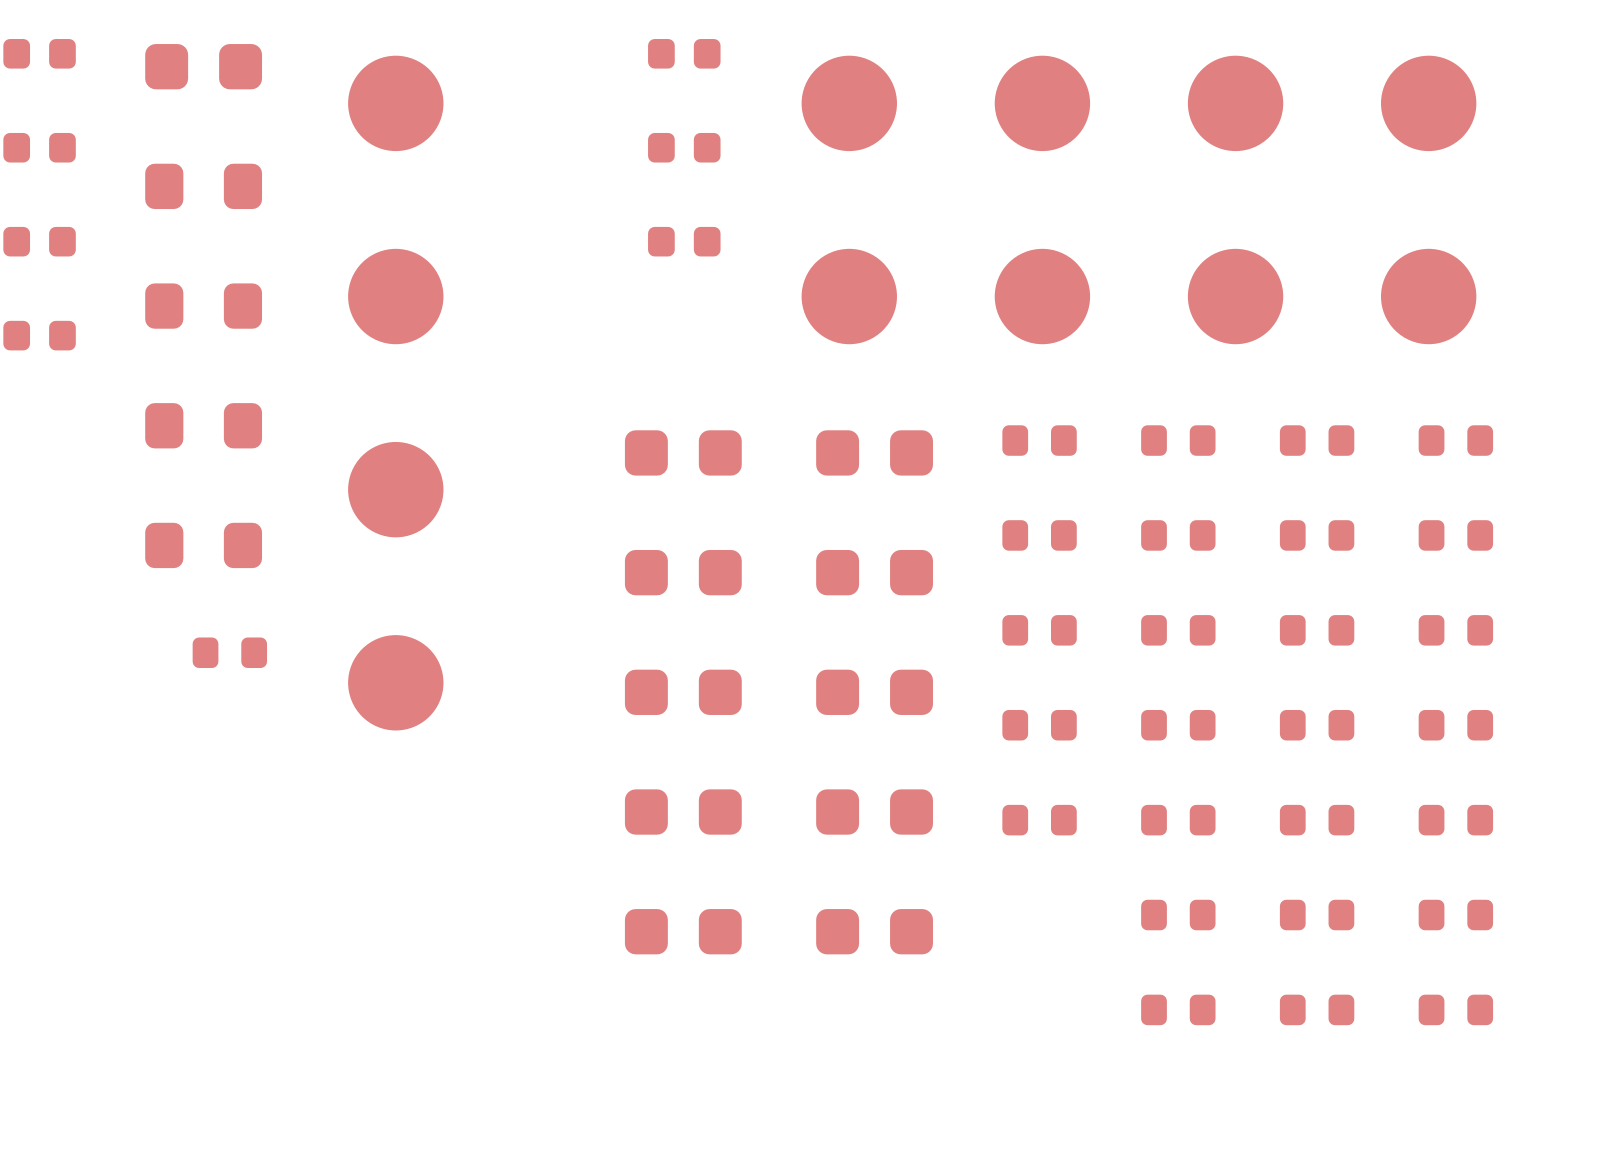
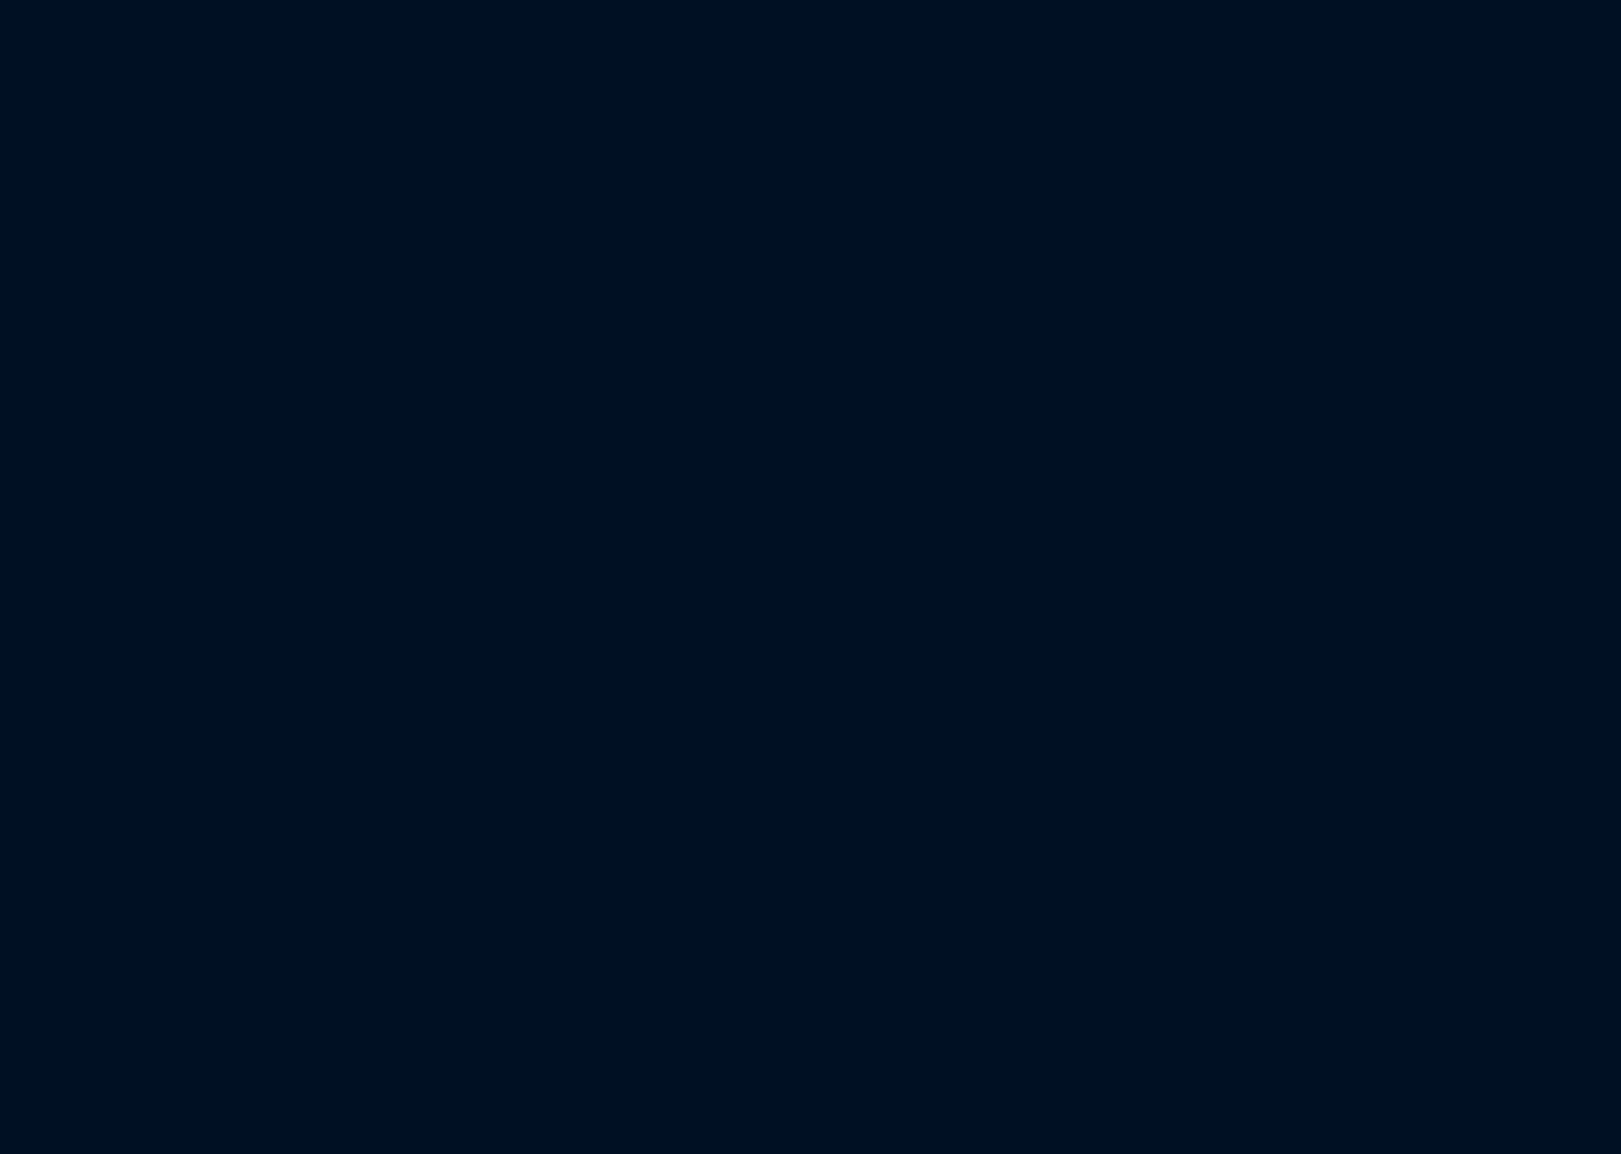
part: (39, 53) -> none
part: (684, 53) -> none
part: (203, 66) -> none
part: (395, 103) -> none
part: (849, 103) -> none
part: (1042, 103) -> none
part: (1235, 103) -> none
part: (1428, 103) -> none
part: (39, 147) -> none
part: (684, 147) -> none
part: (203, 186) -> none
part: (39, 241) -> none
part: (684, 241) -> none
part: (395, 296) -> none
part: (849, 296) -> none
part: (1042, 296) -> none
part: (1235, 296) -> none
part: (1428, 296) -> none
part: (203, 306) -> none
part: (39, 335) -> none
part: (203, 425) -> none
part: (1039, 440) -> none
part: (1178, 440) -> none
part: (1317, 440) -> none
part: (1455, 440) -> none
part: (683, 452) -> none
part: (874, 452) -> none
part: (395, 489) -> none
part: (1039, 535) -> none
part: (1178, 535) -> none
part: (1317, 535) -> none
part: (1455, 535) -> none
part: (203, 545) -> none
part: (683, 572) -> none
part: (874, 572) -> none
part: (1039, 630) -> none
part: (1178, 630) -> none
part: (1317, 630) -> none
part: (1455, 630) -> none
part: (229, 652) -> none
part: (395, 682) -> none
part: (683, 692) -> none
part: (874, 692) -> none
part: (1039, 725) -> none
part: (1178, 725) -> none
part: (1317, 725) -> none
part: (1455, 725) -> none
part: (683, 812) -> none
part: (874, 812) -> none
part: (1039, 820) -> none
part: (1178, 820) -> none
part: (1317, 820) -> none
part: (1455, 820) -> none
part: (1178, 915) -> none
part: (1317, 915) -> none
part: (1455, 915) -> none
part: (683, 931) -> none
part: (874, 931) -> none
part: (1178, 1009) -> none
part: (1317, 1009) -> none
part: (1455, 1009) -> none

